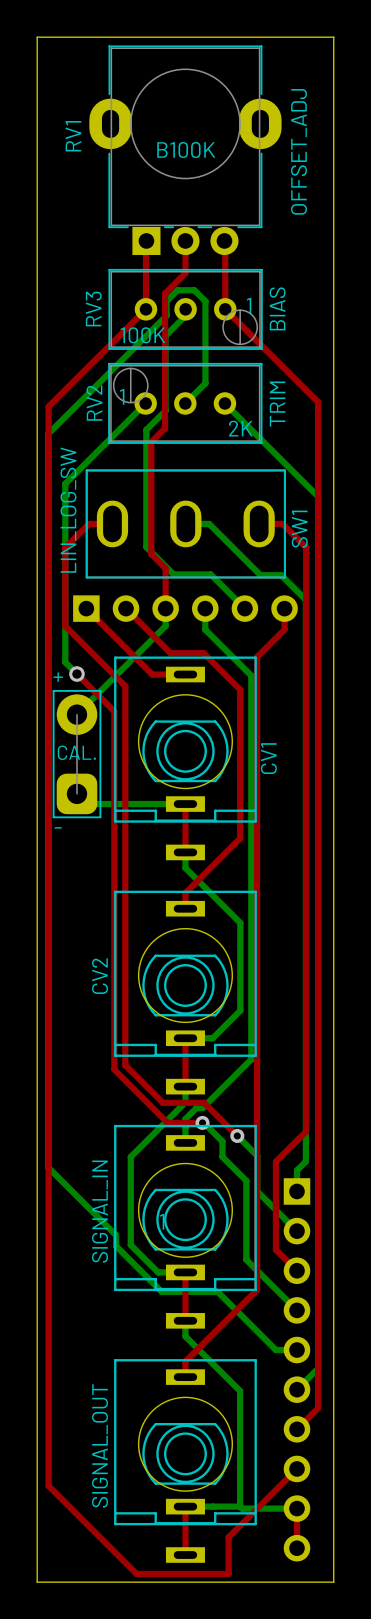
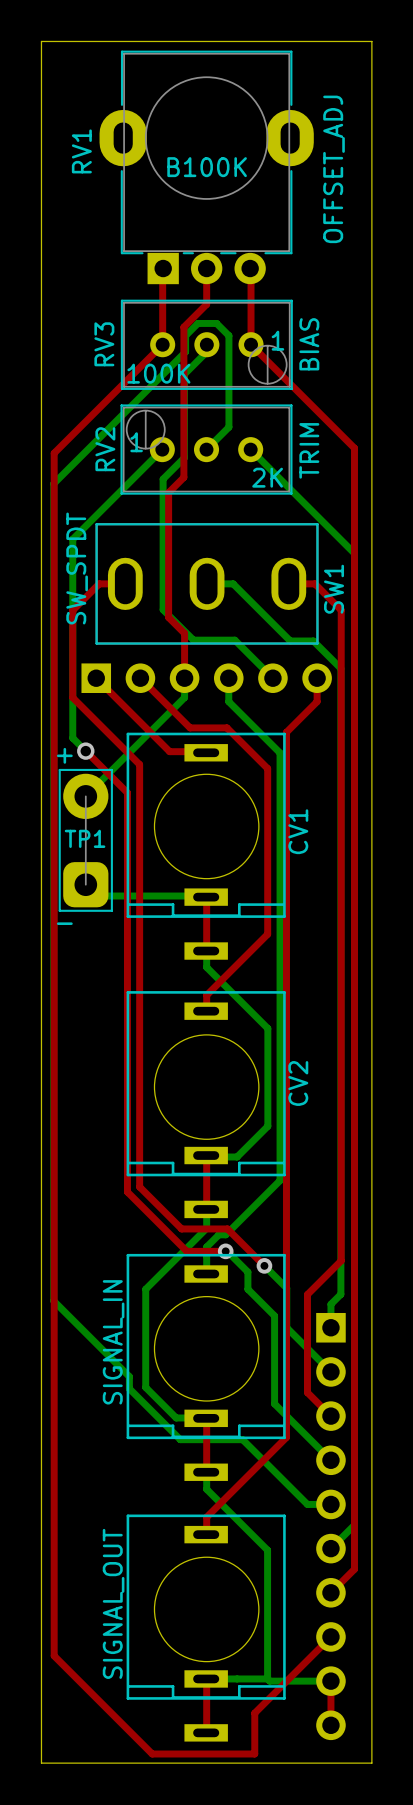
SW1 value: LIN_LOG_SW (68, 510) -> SW_SPDT (77, 568)
CV1 footprint: [114, 656, 257, 861] -> [126, 732, 286, 960]
CAL. name: CAL. (76, 752) -> TP1 (85, 838)
CV2 footprint: [114, 890, 257, 1095] -> [126, 991, 286, 1219]
CV2 name position: CV2 (100, 976) -> CV2 (298, 1083)
SIGNAL_IN footprint: [114, 1124, 257, 1329] -> [126, 1253, 286, 1481]
text: 1 (162, 1221) -> none
SIGNAL_OUT footprint: [114, 1359, 257, 1563] -> [126, 1514, 286, 1742]

